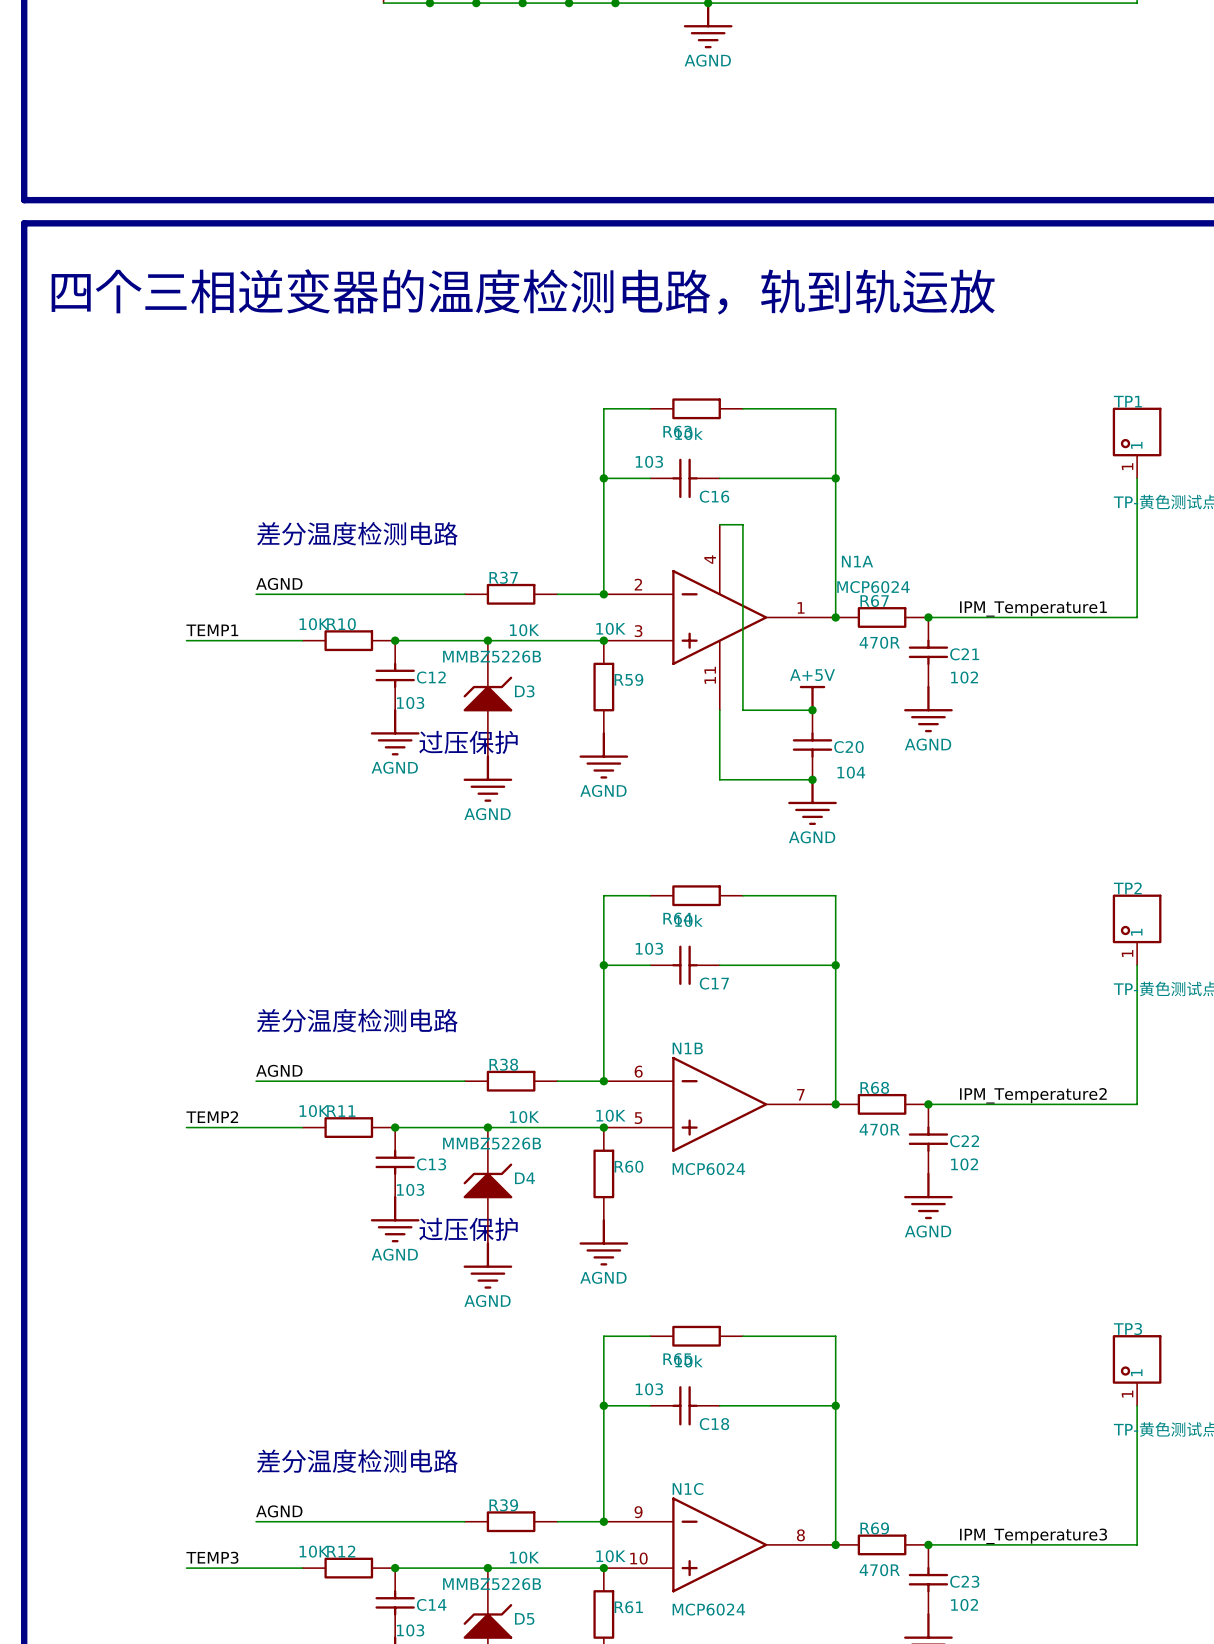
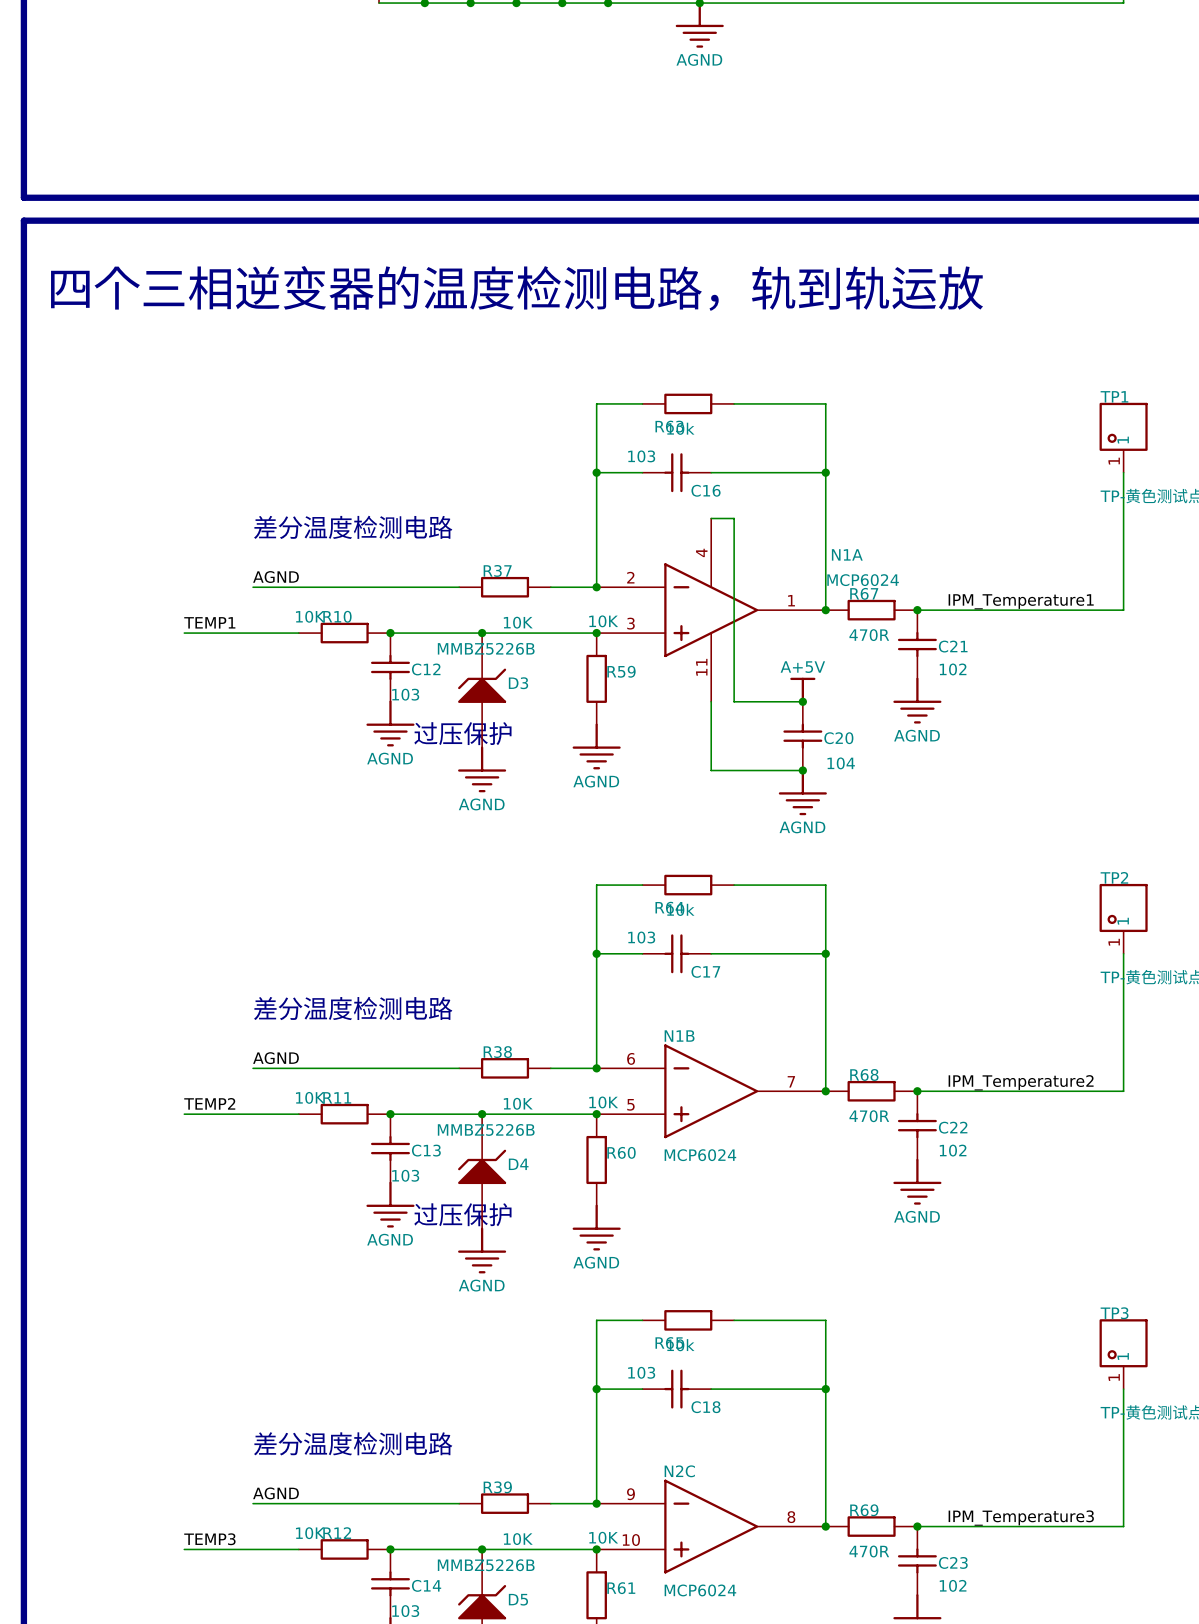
N1C name: N1C (687, 1489) -> N2C (679, 1471)

